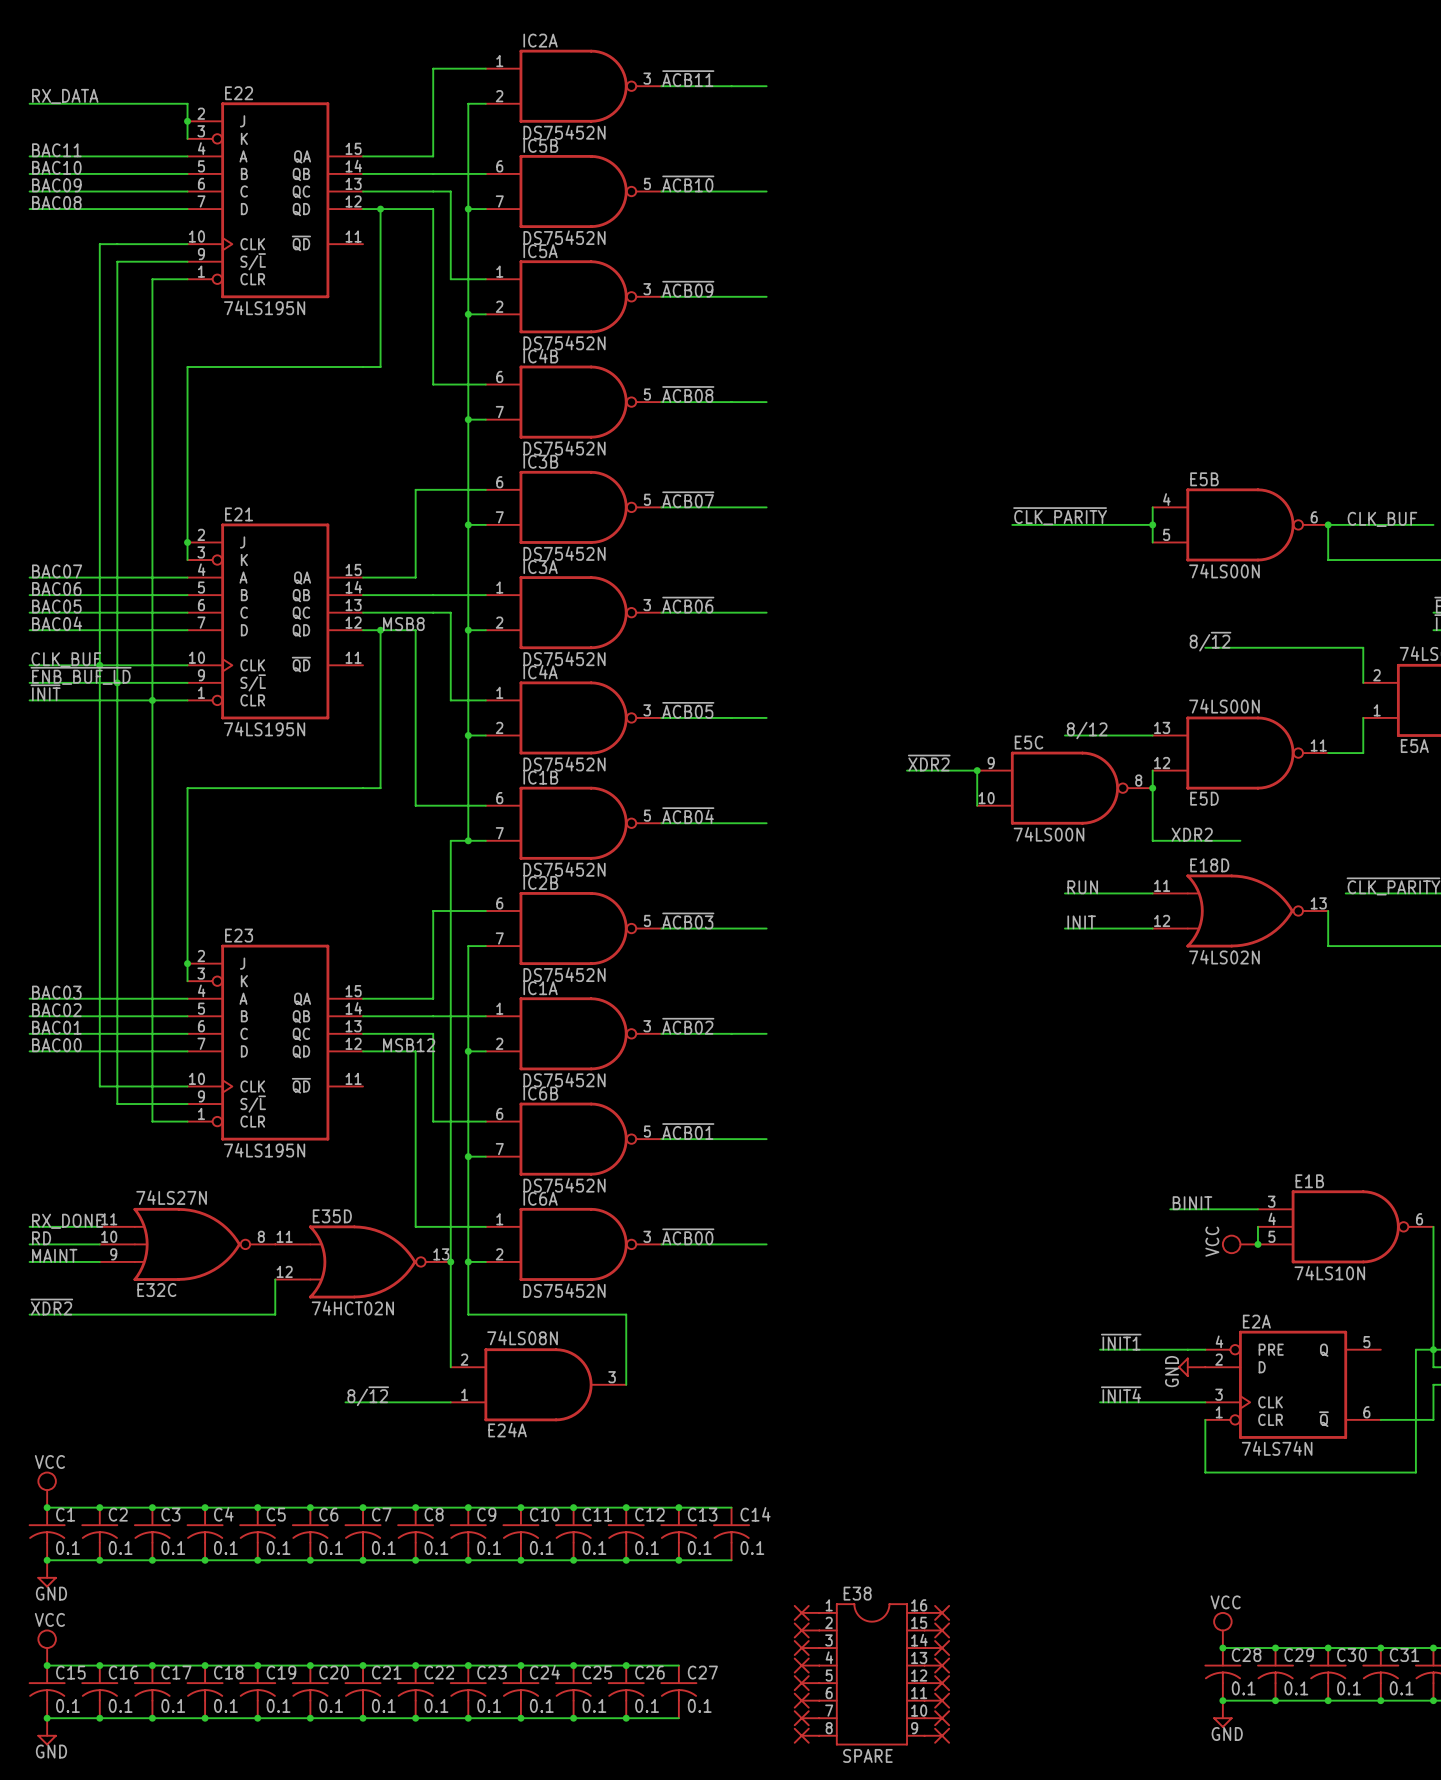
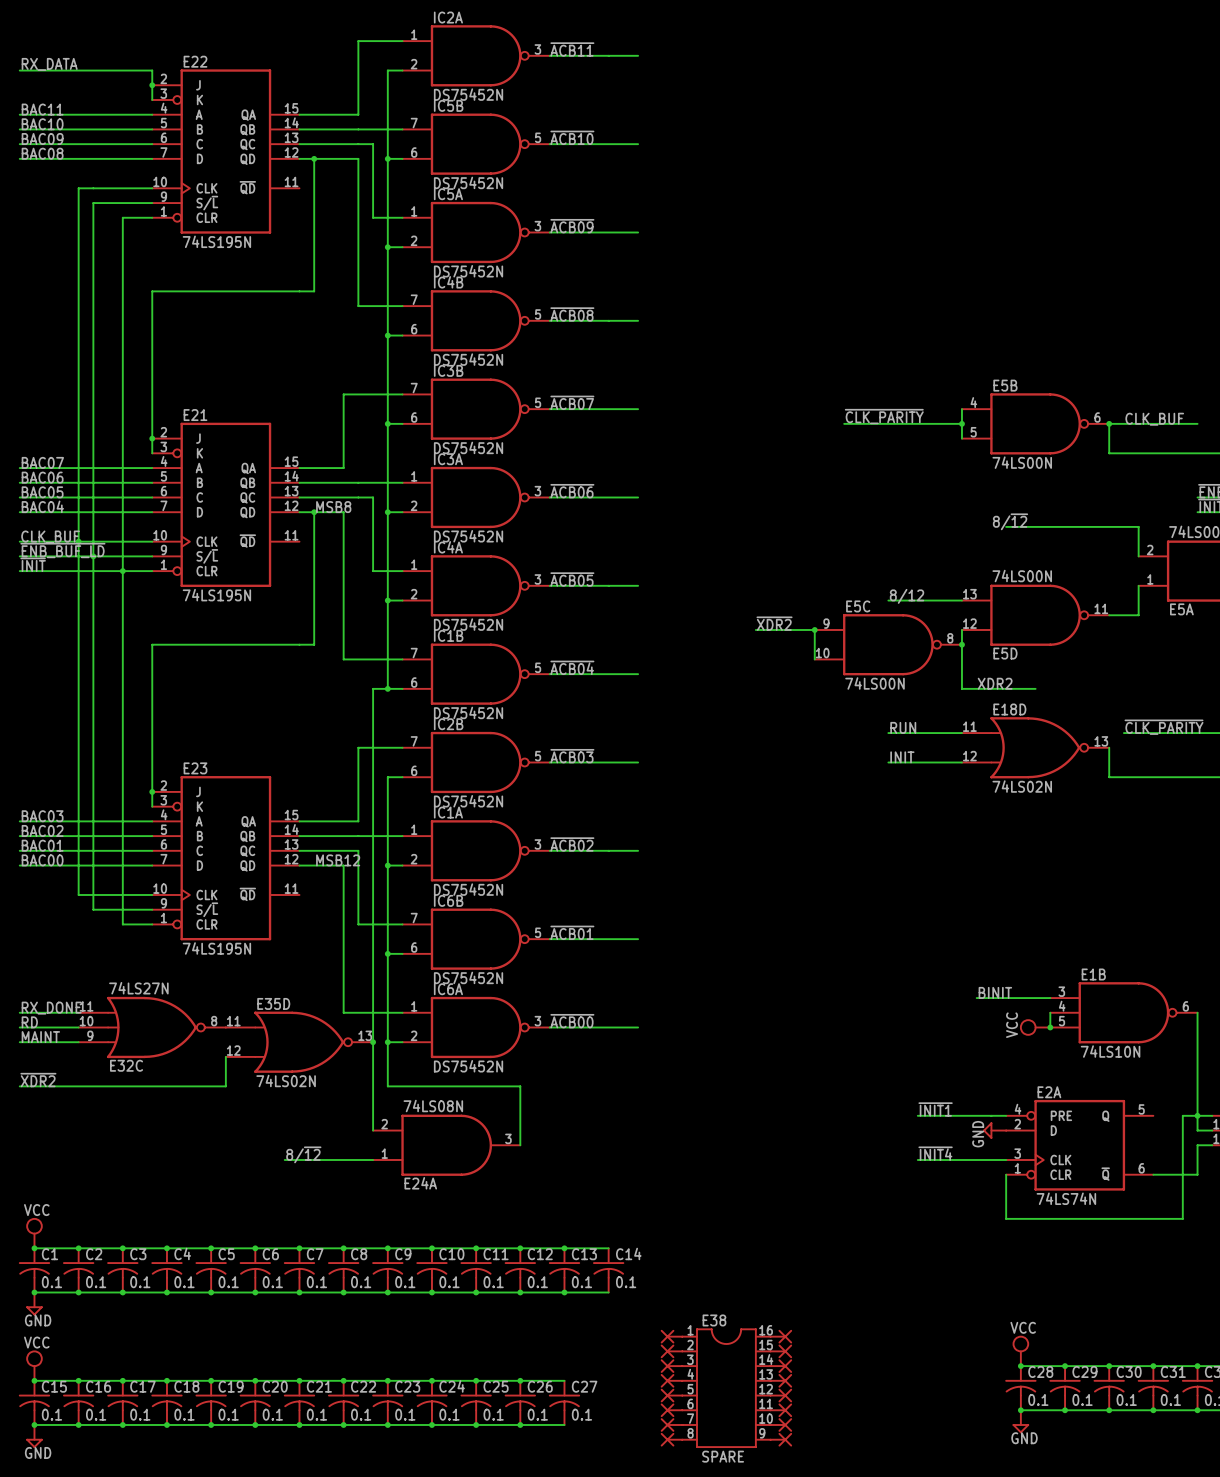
IC5B flip: as is (573, 191) -> up-down (476, 144)
IC4B flip: as is (573, 402) -> up-down (476, 320)
IC3B flip: as is (573, 507) -> up-down (476, 409)
IC1B flip: as is (573, 823) -> up-down (476, 674)
IC2B flip: as is (573, 928) -> up-down (476, 762)
IC6B flip: as is (573, 1139) -> up-down (476, 939)
E35D value: 74HCT02N (352, 1308) -> 74LS02N (286, 1080)

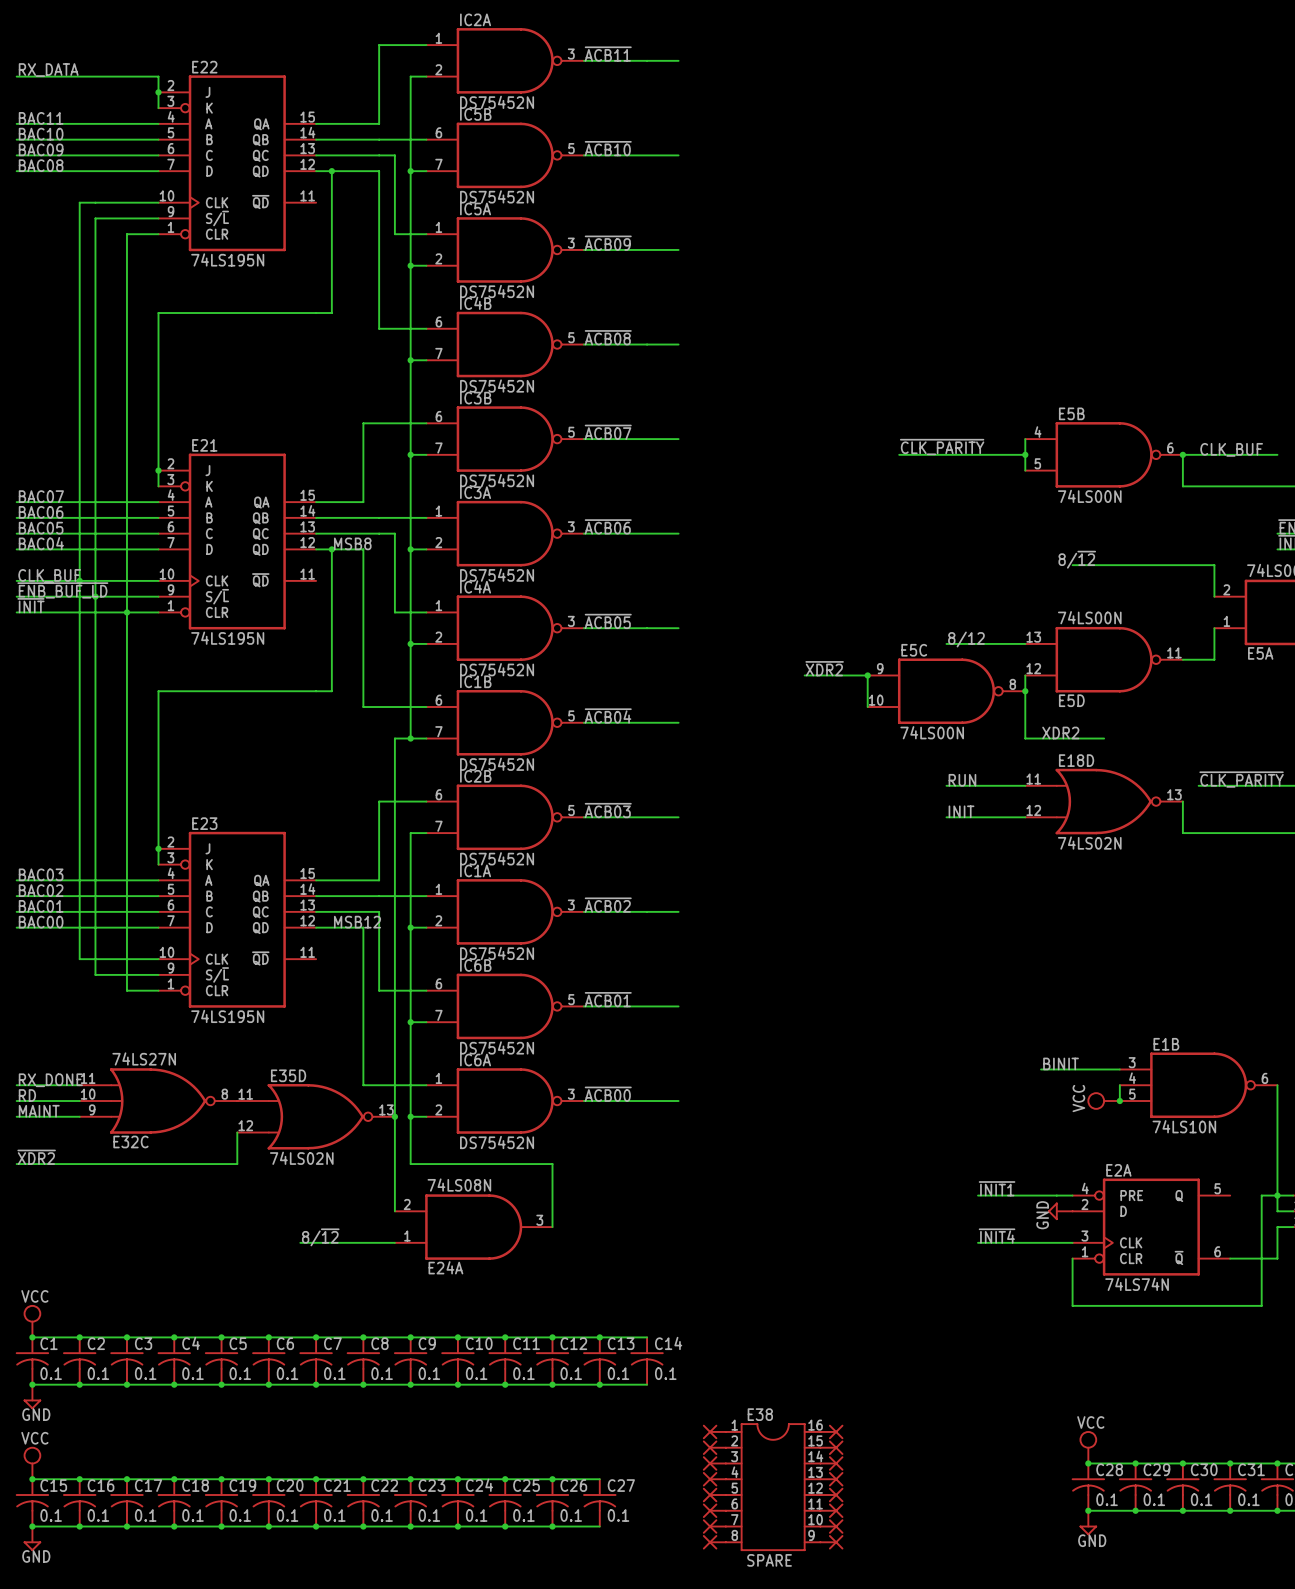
IC5B flip: as is (476, 144) -> up-down (505, 155)
IC4B flip: as is (476, 320) -> up-down (505, 344)
IC3B flip: as is (476, 409) -> up-down (505, 439)
IC1B flip: as is (476, 674) -> up-down (505, 722)
IC2B flip: as is (476, 762) -> up-down (505, 817)
IC6B flip: as is (476, 939) -> up-down (505, 1006)

